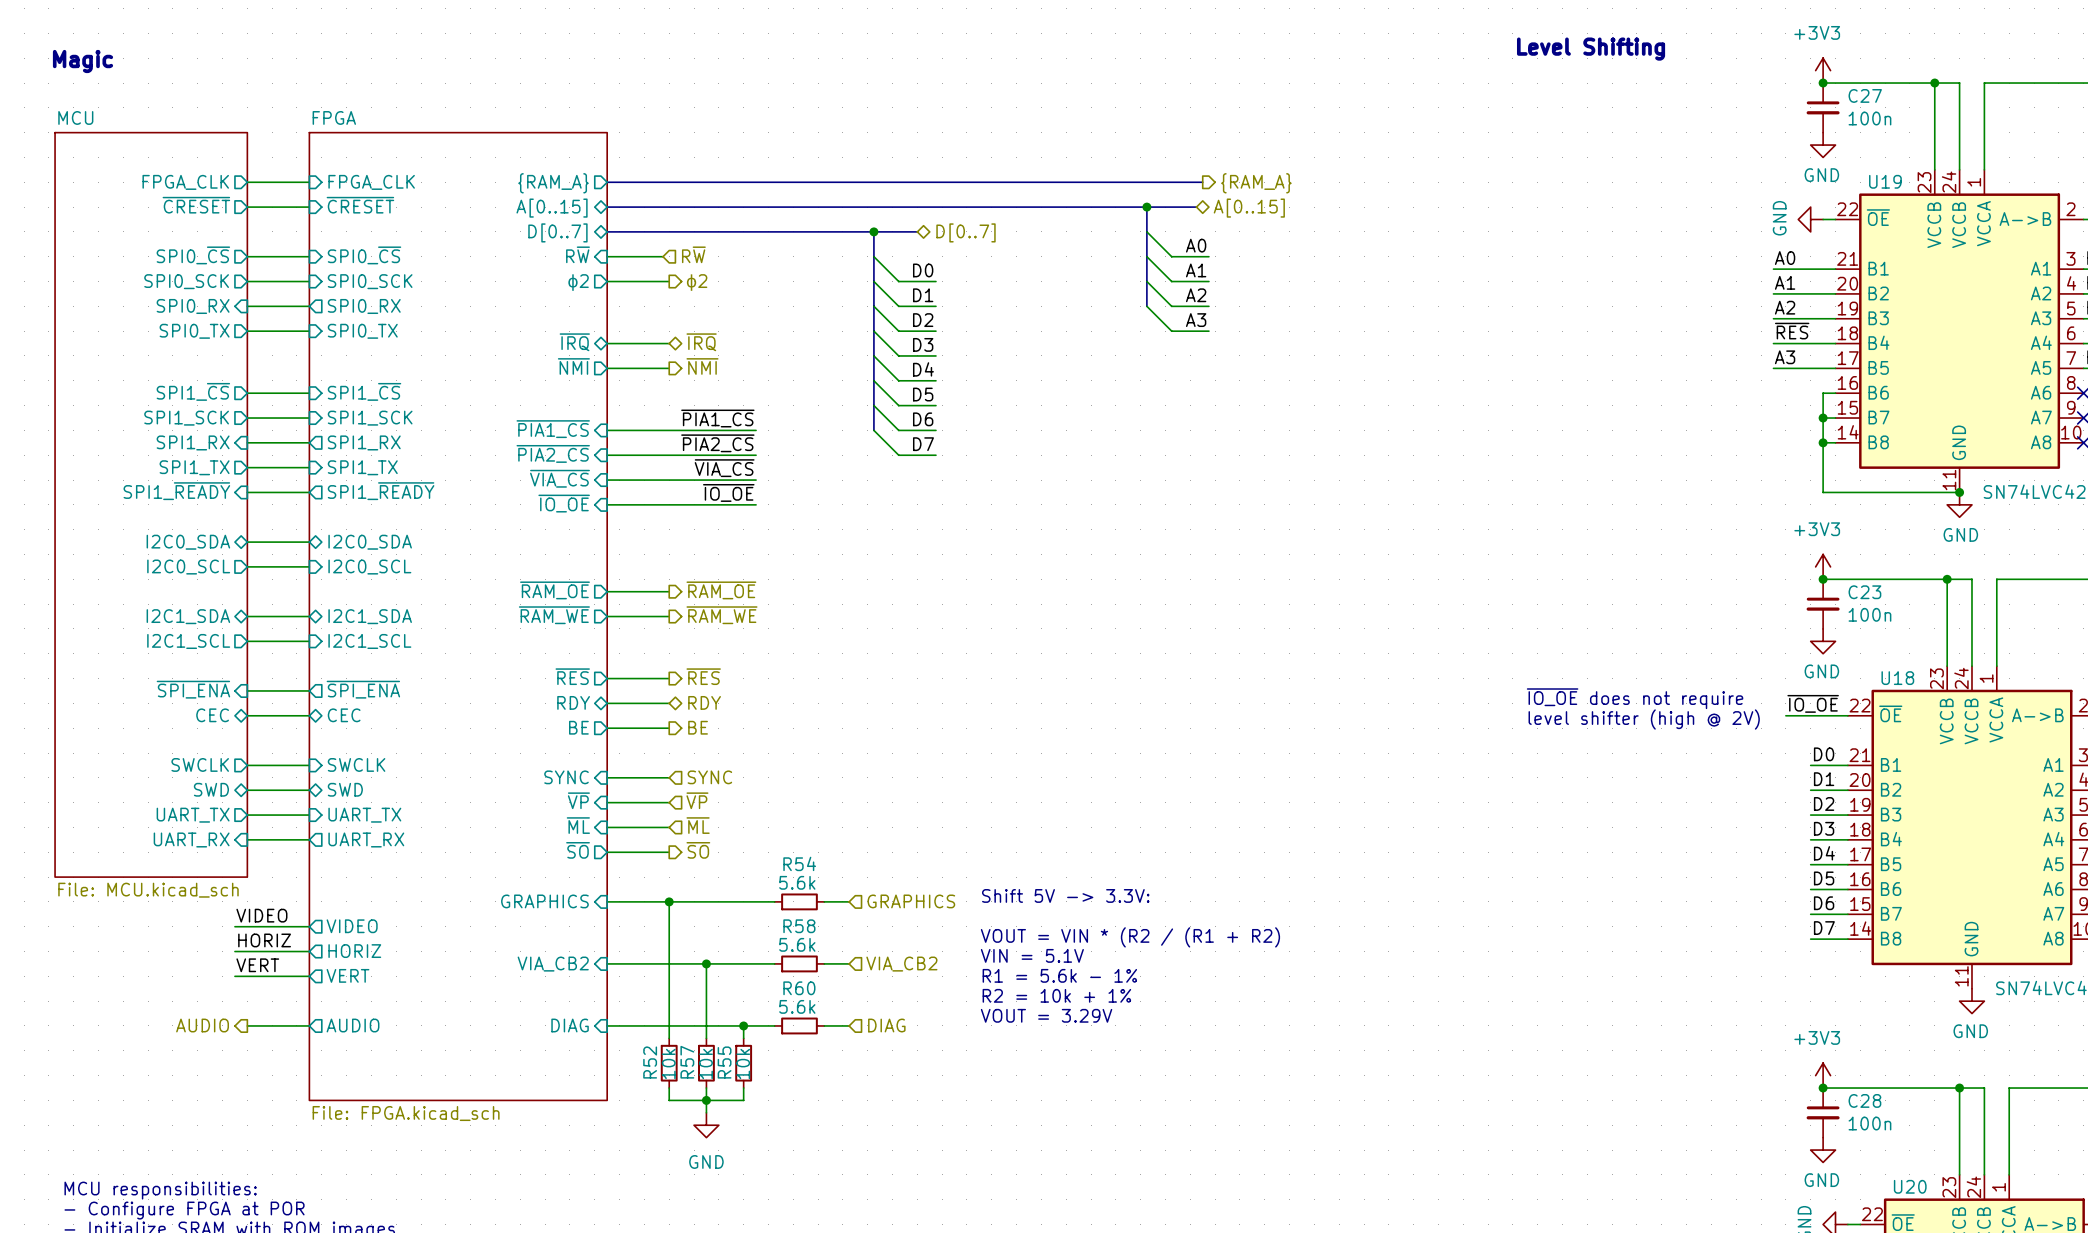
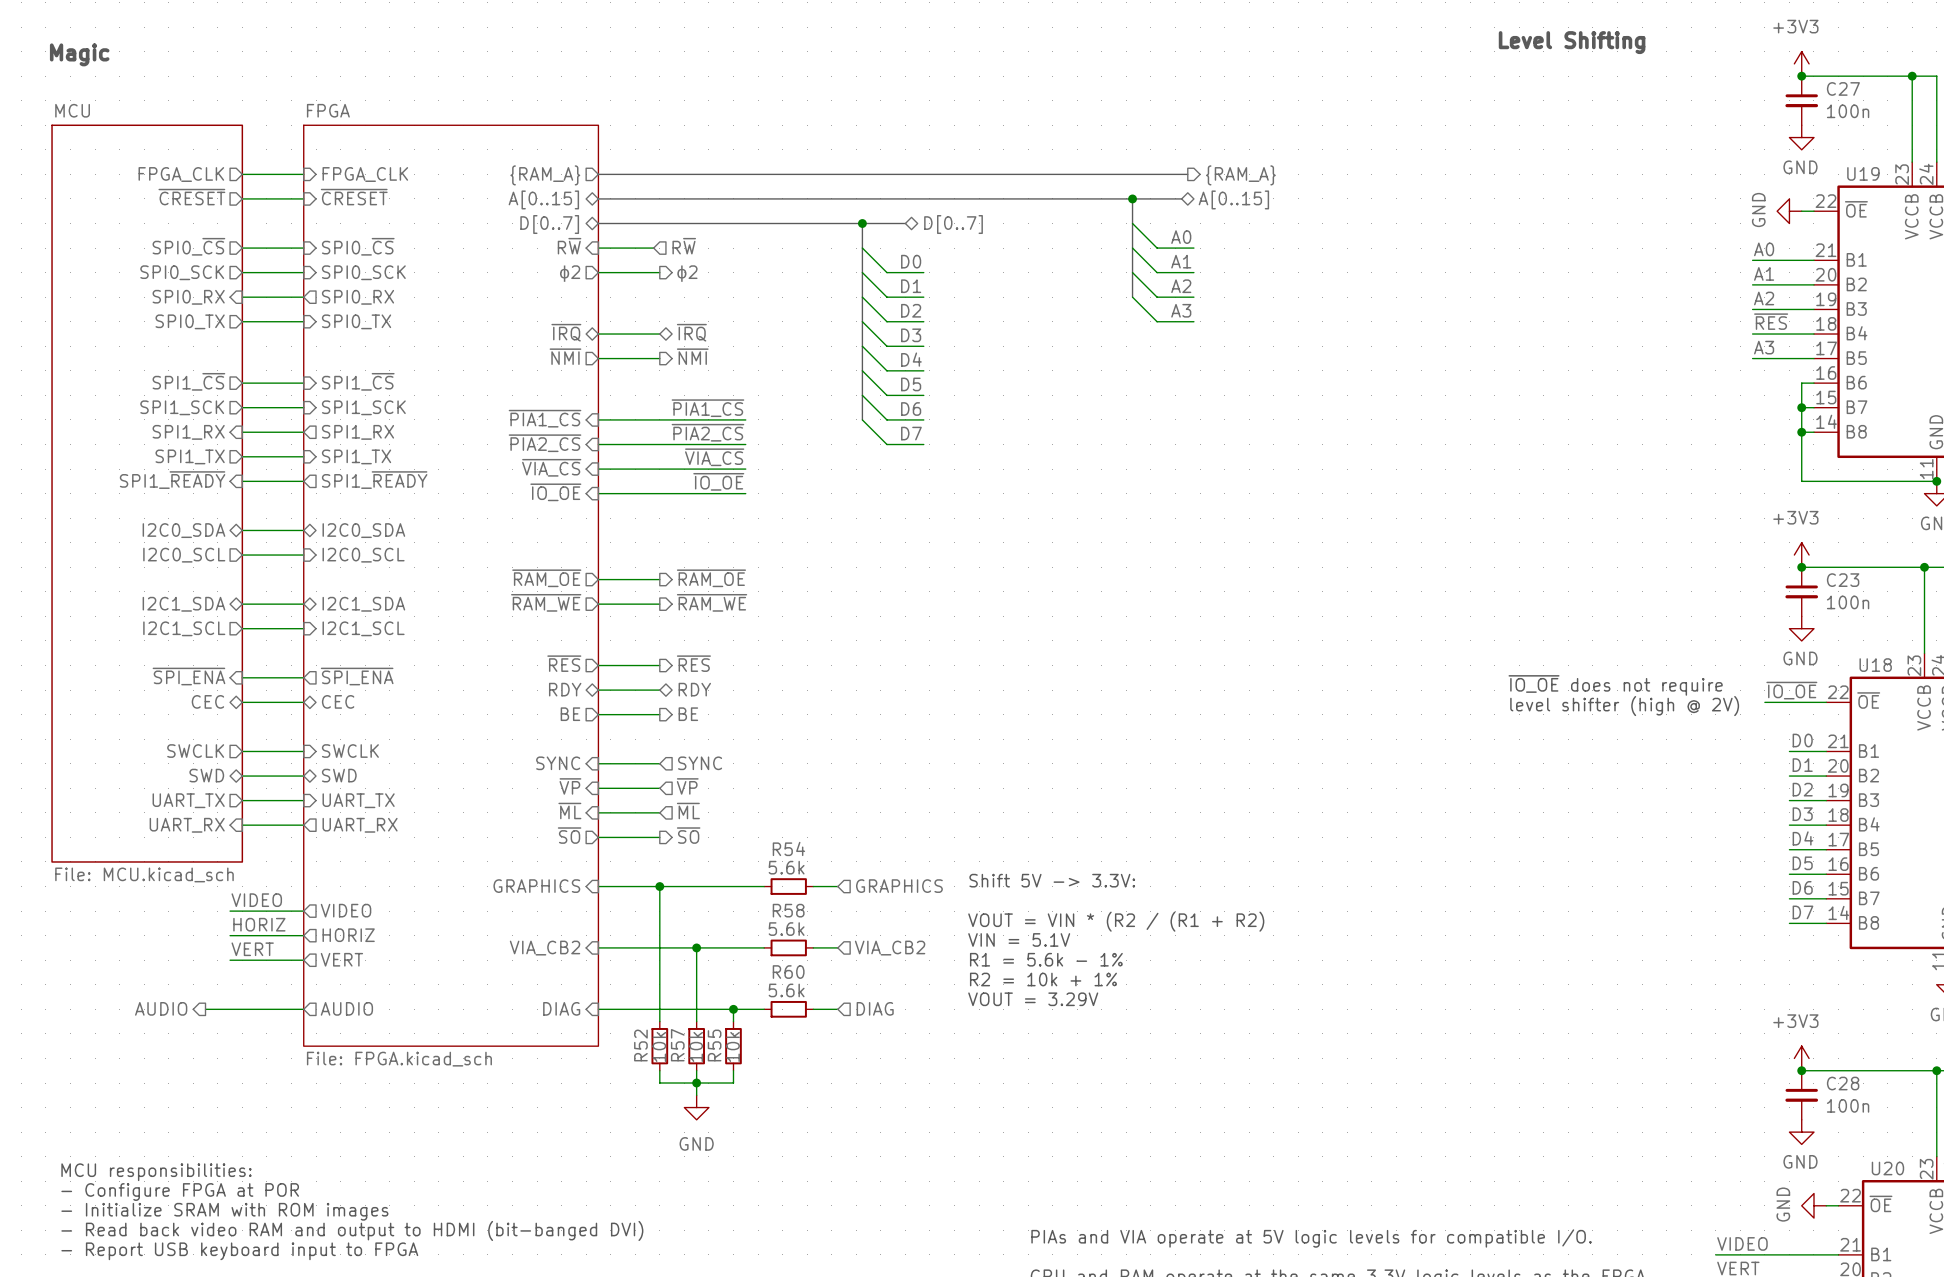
sheet FPGA: none -> File: FPGA.kicad_sch (451, 585)
sheet FPGA: File: FPGA.kicad_sch (458, 616) -> none
hierarchical label position: AUDIO (202, 1025) -> AUDIO (161, 1008)
wire: none -> (205, 1009) (242, 1009)

